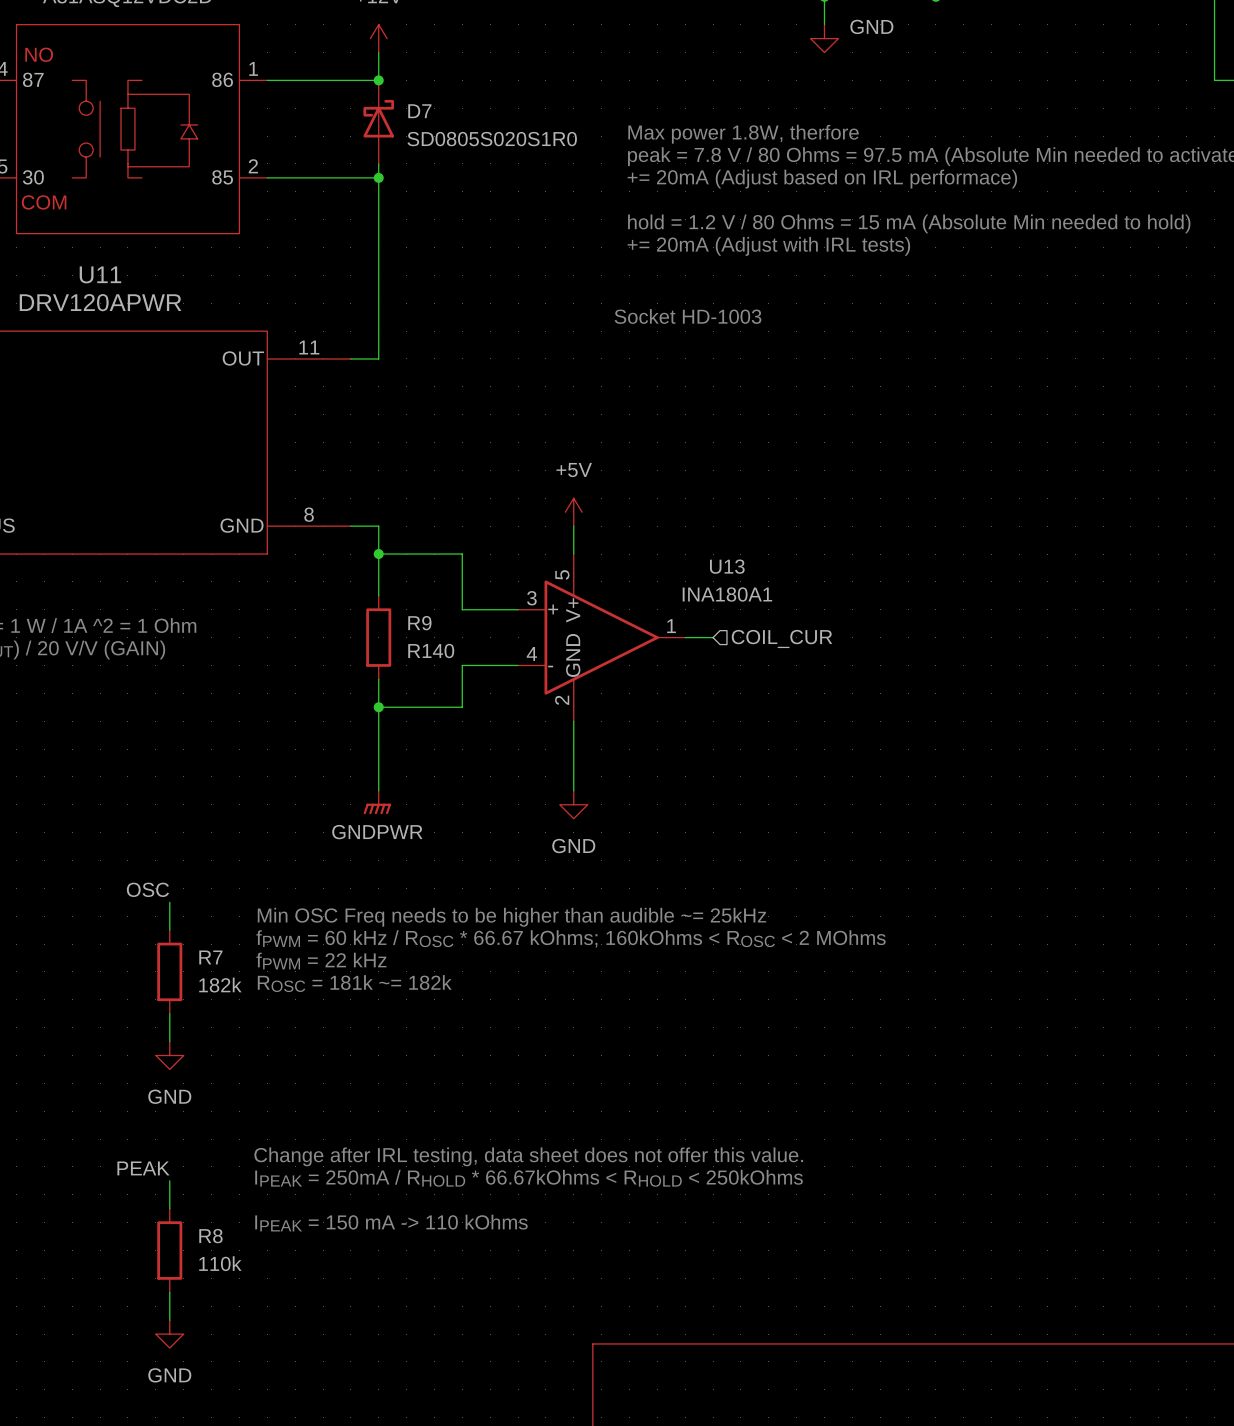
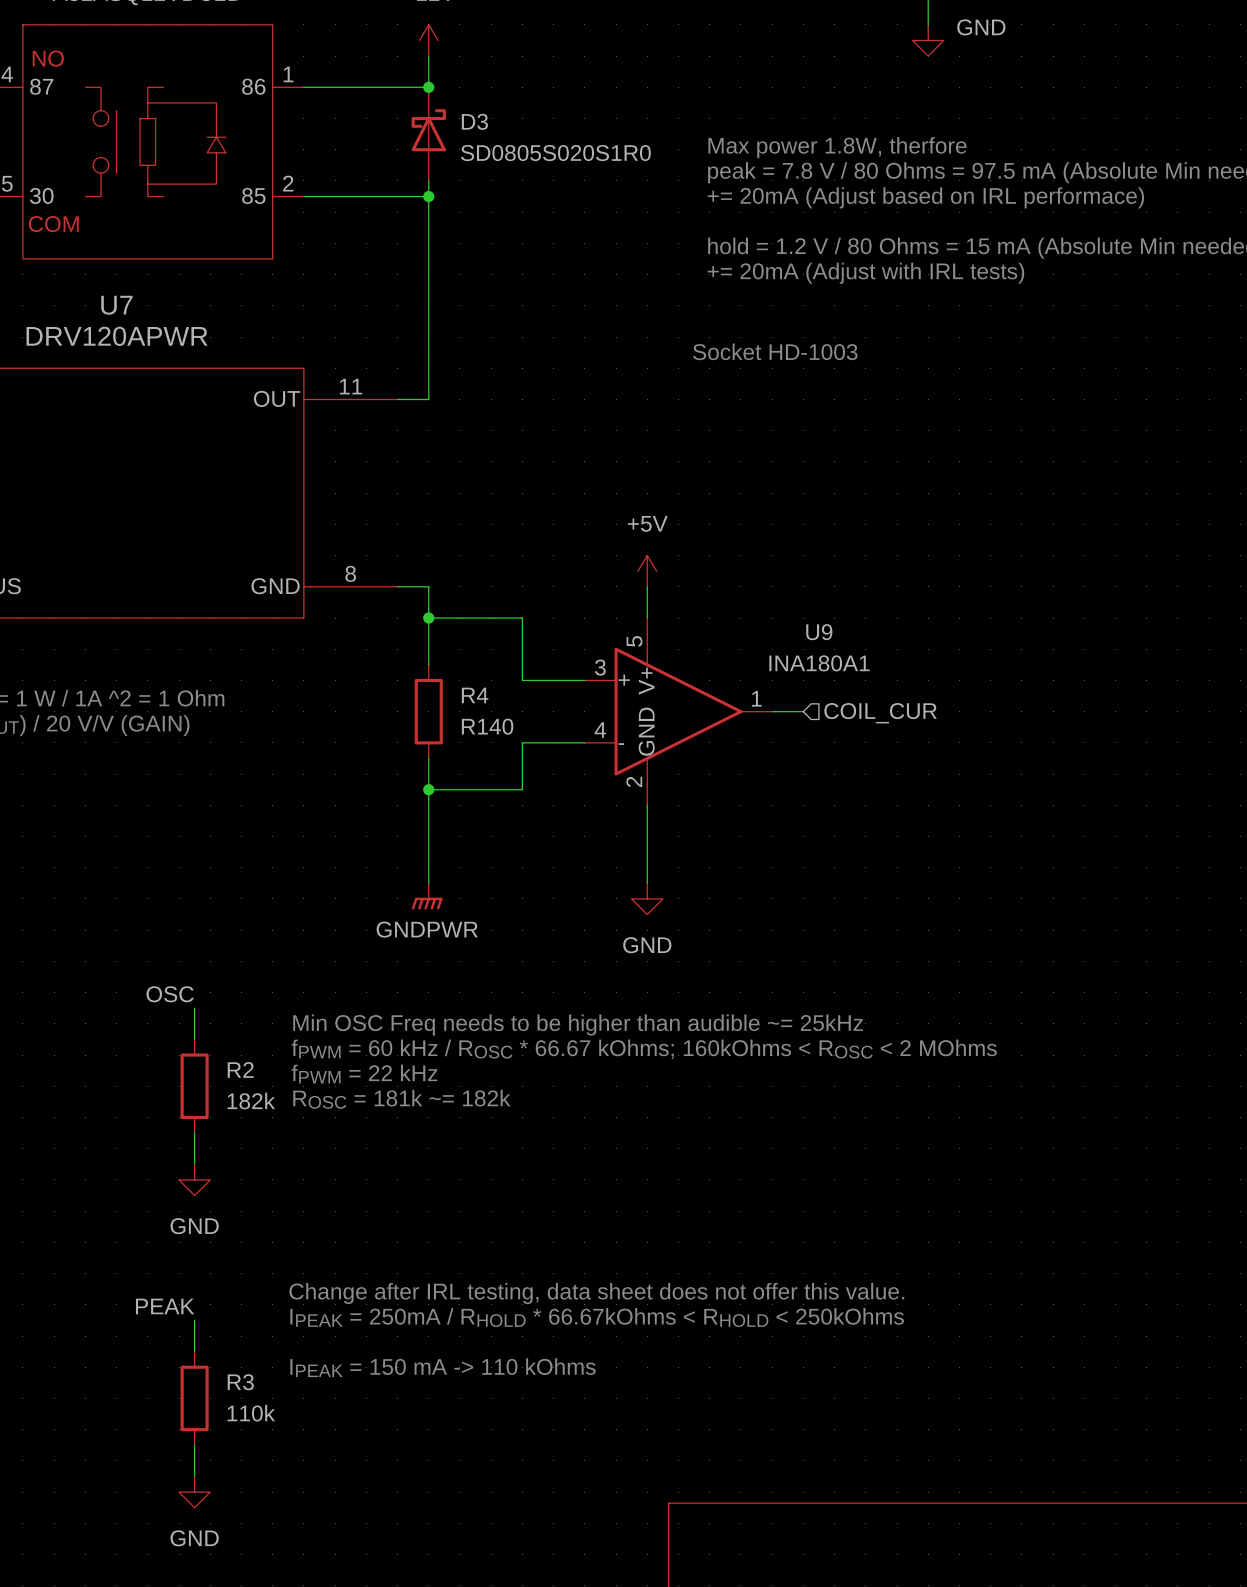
D7 name: D7 (419, 111) -> D3 (474, 121)
U11 name: U11 (100, 274) -> U7 (116, 305)
U13 name: U13 (727, 566) -> U9 (819, 632)
R9 name: R9 (419, 623) -> R4 (475, 695)
R7 name: R7 (210, 957) -> R2 (240, 1069)
R8 name: R8 (210, 1236) -> R3 (240, 1382)

